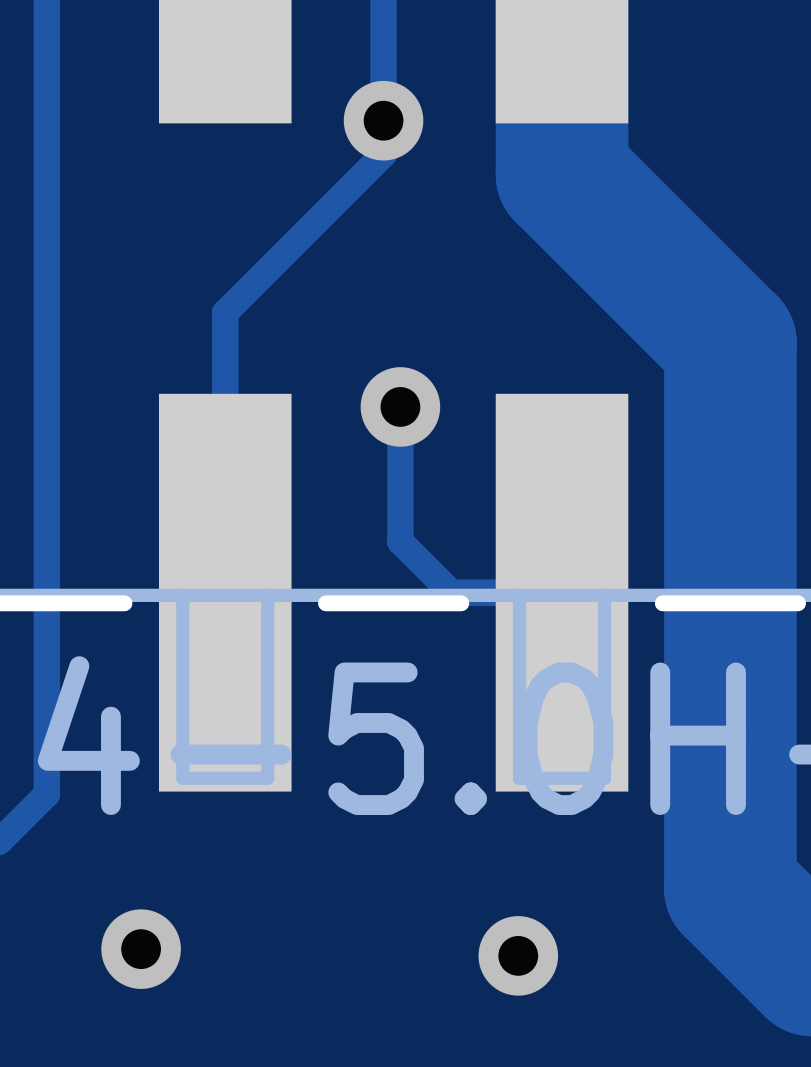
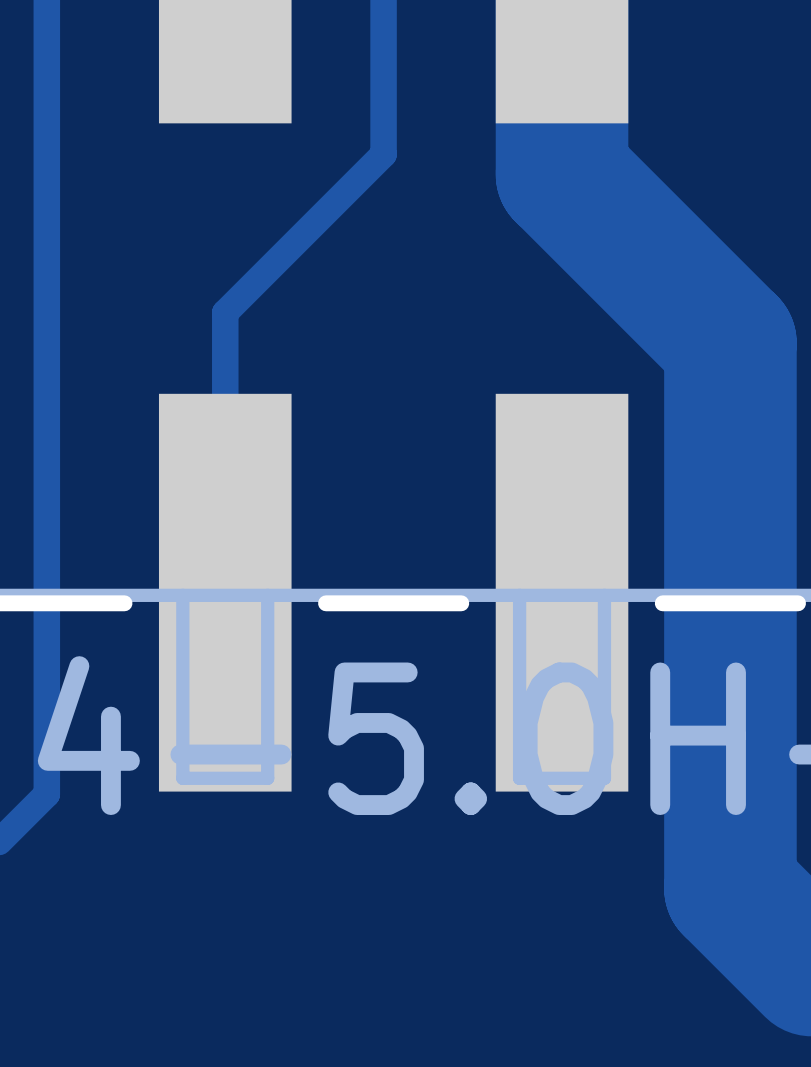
via: (383, 120) -> none
track: (400, 406) (400, 541) (451, 592) (562, 592) -> none
via: (400, 406) -> none
via: (141, 949) -> none
via: (518, 955) -> none

